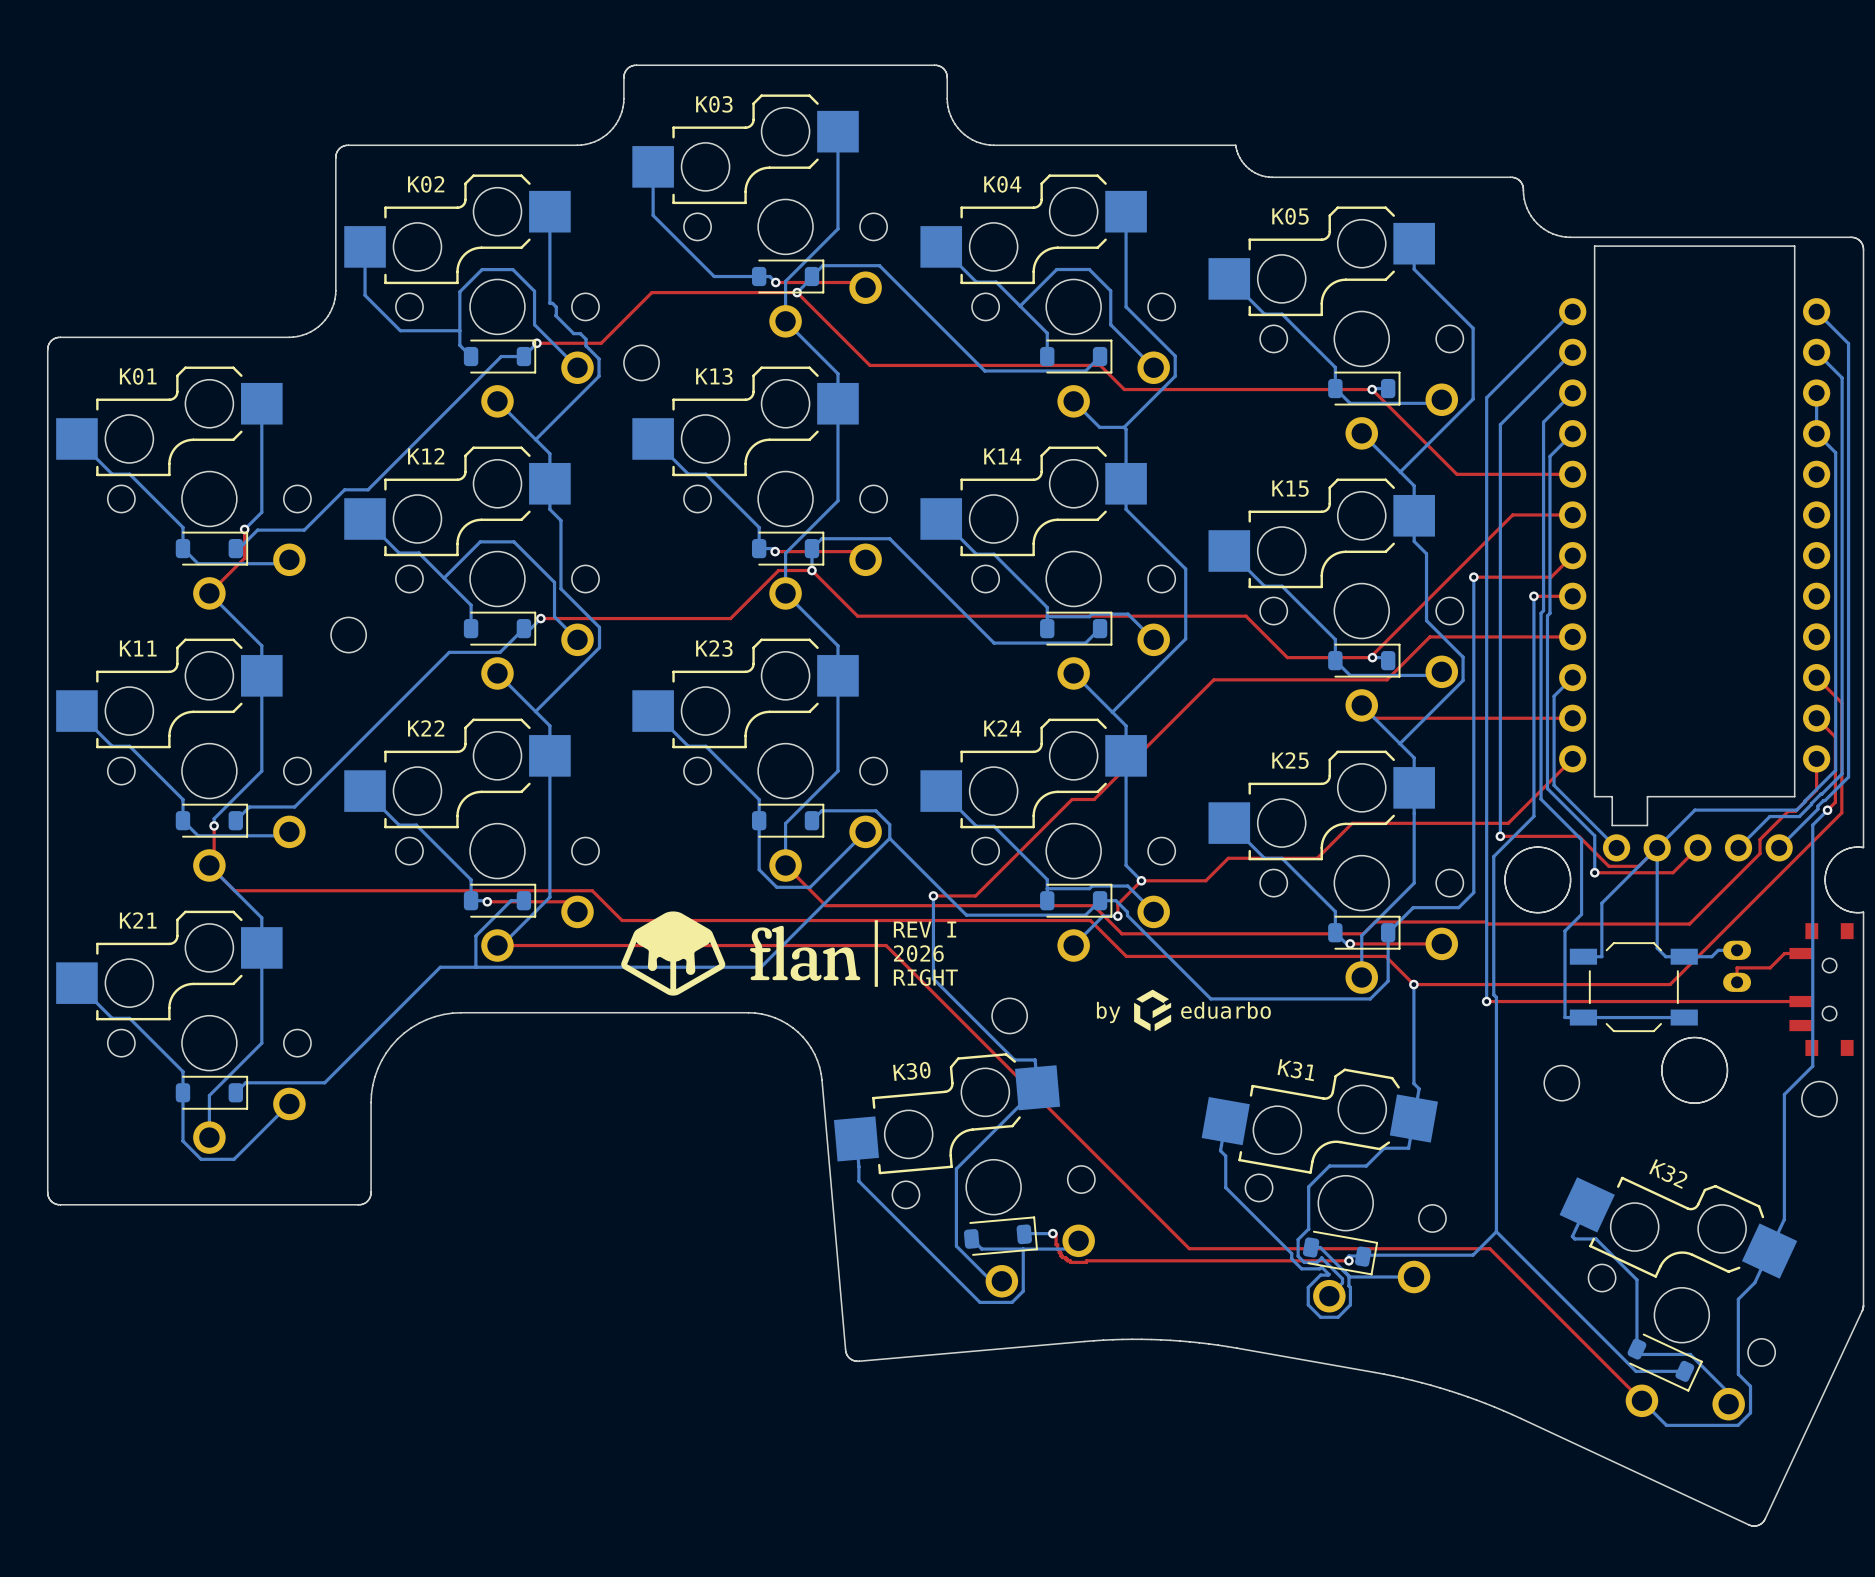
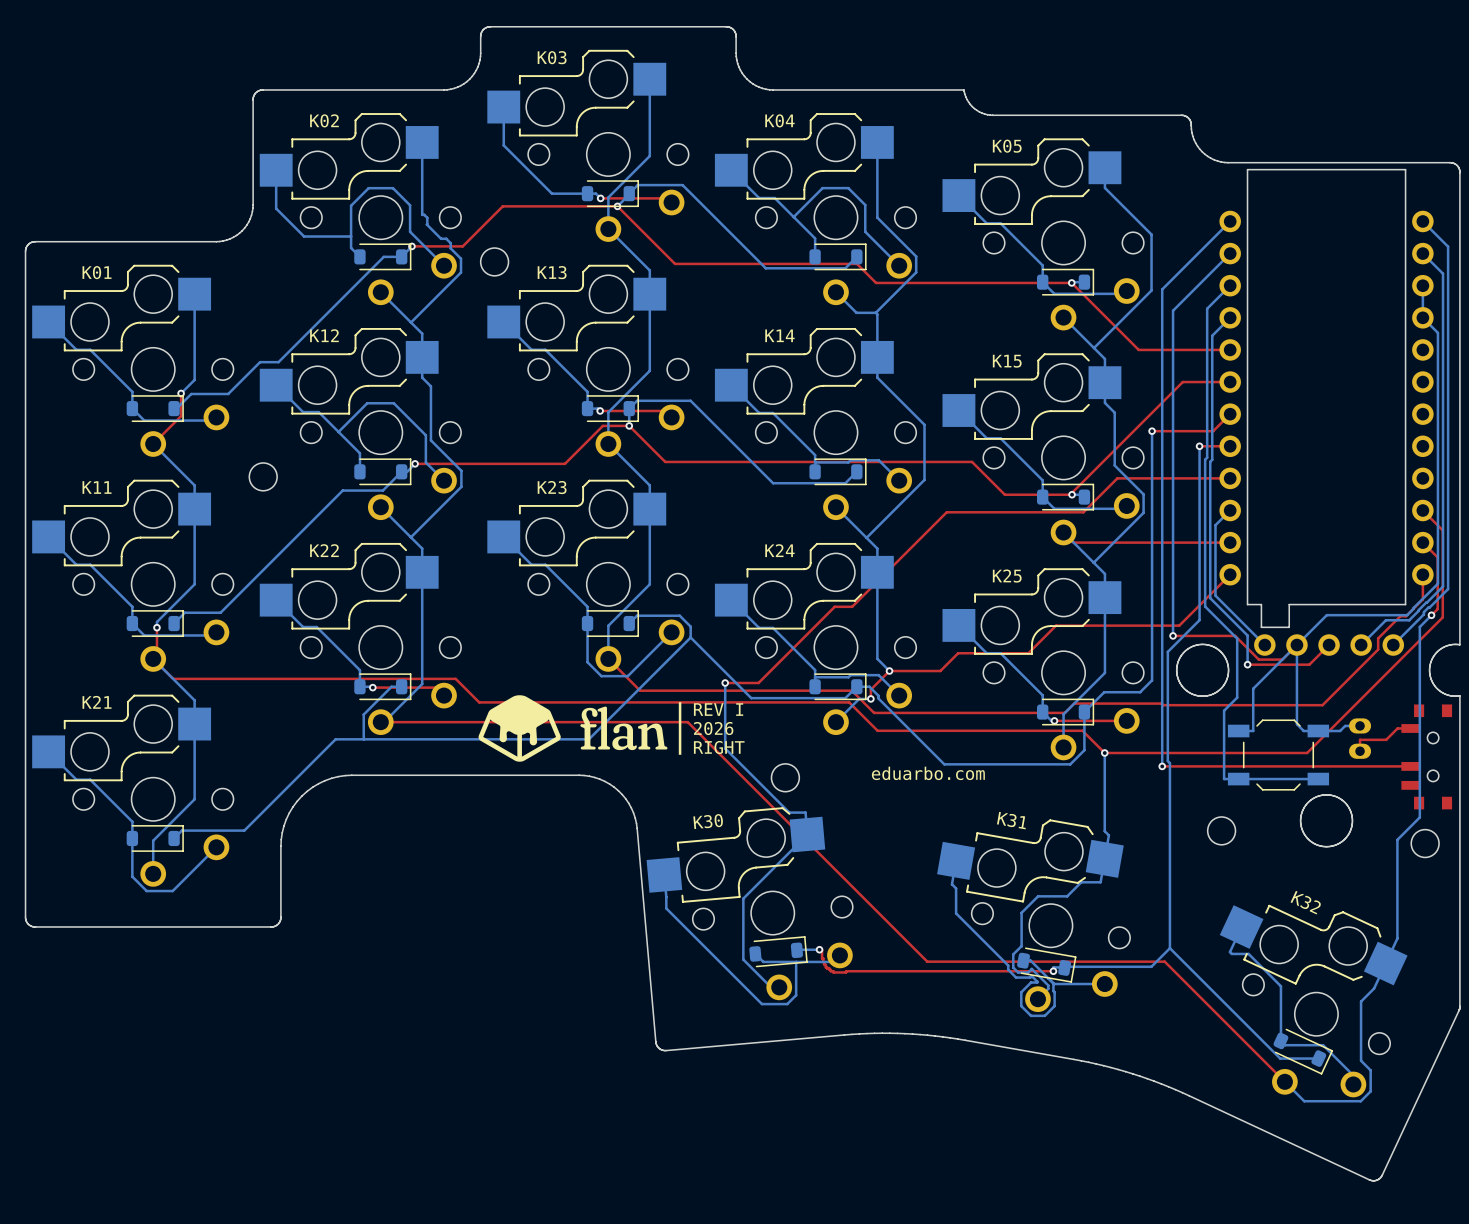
drawing: [1134, 989, 1172, 1032] -> none
text: eduarbo (1225, 1010) -> eduarbo.com (928, 773)
text: by (1108, 1012) -> none

